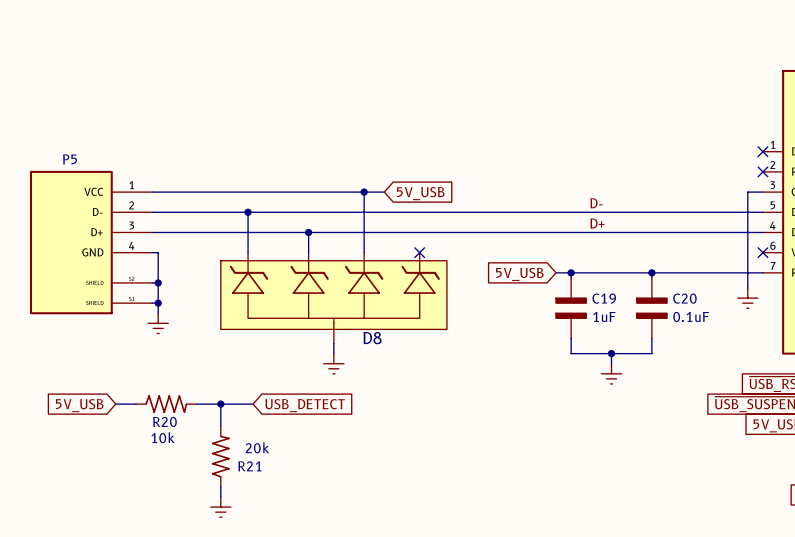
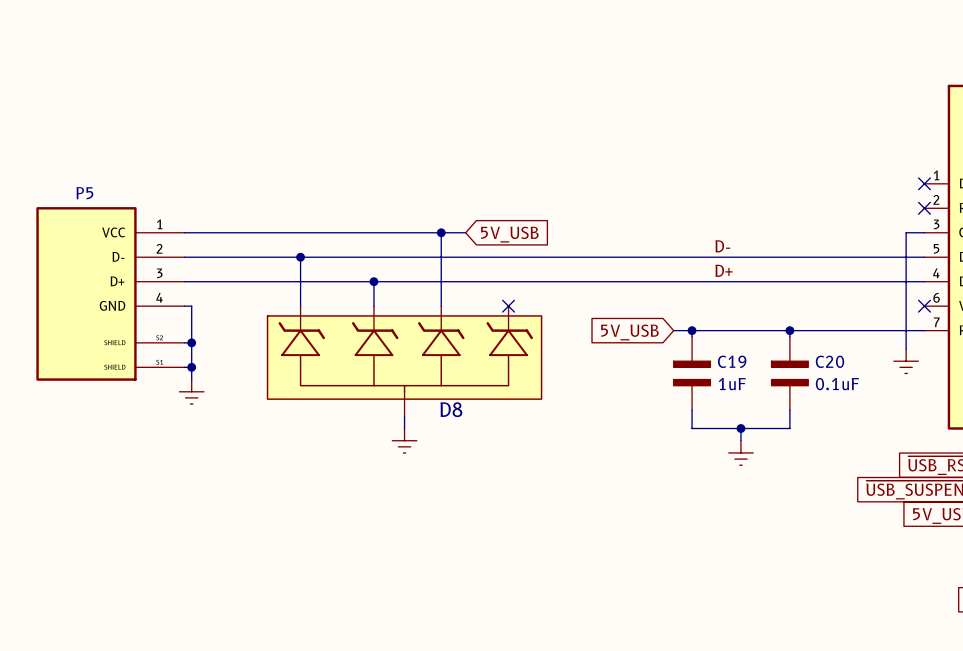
wire: (115, 404) (135, 404) -> none
R20: 10k (166, 404) -> none
wire: (196, 404) (253, 404) -> none
wire: (220, 404) (220, 426) -> none
junction: (220, 404) -> none
global label: 5V_USB (79, 405) -> none
global label: USB_DETECT (305, 405) -> none
R21: 20k (220, 456) -> none
wire: (220, 486) (220, 496) -> none
power symbol: (220, 507) -> none

